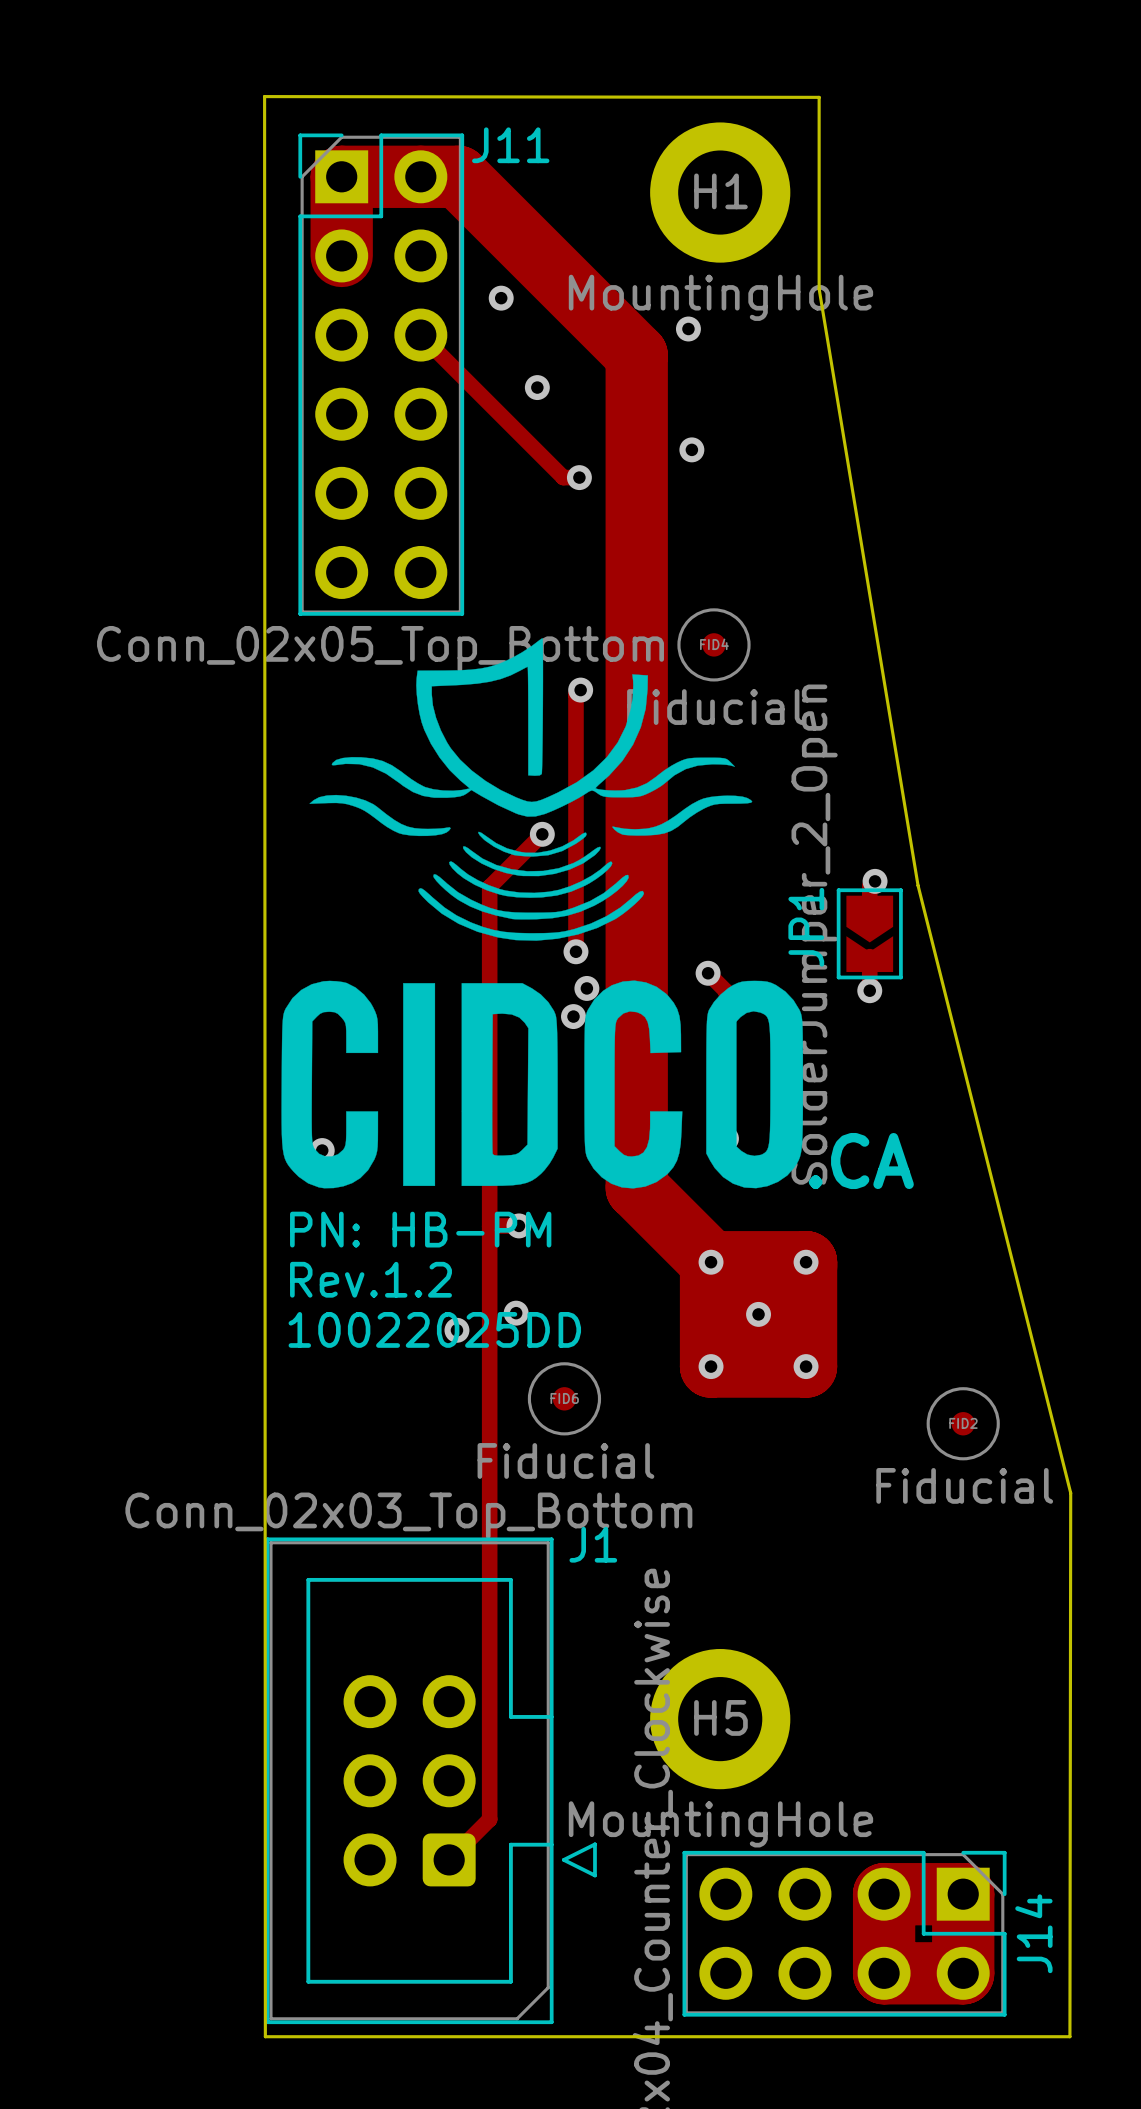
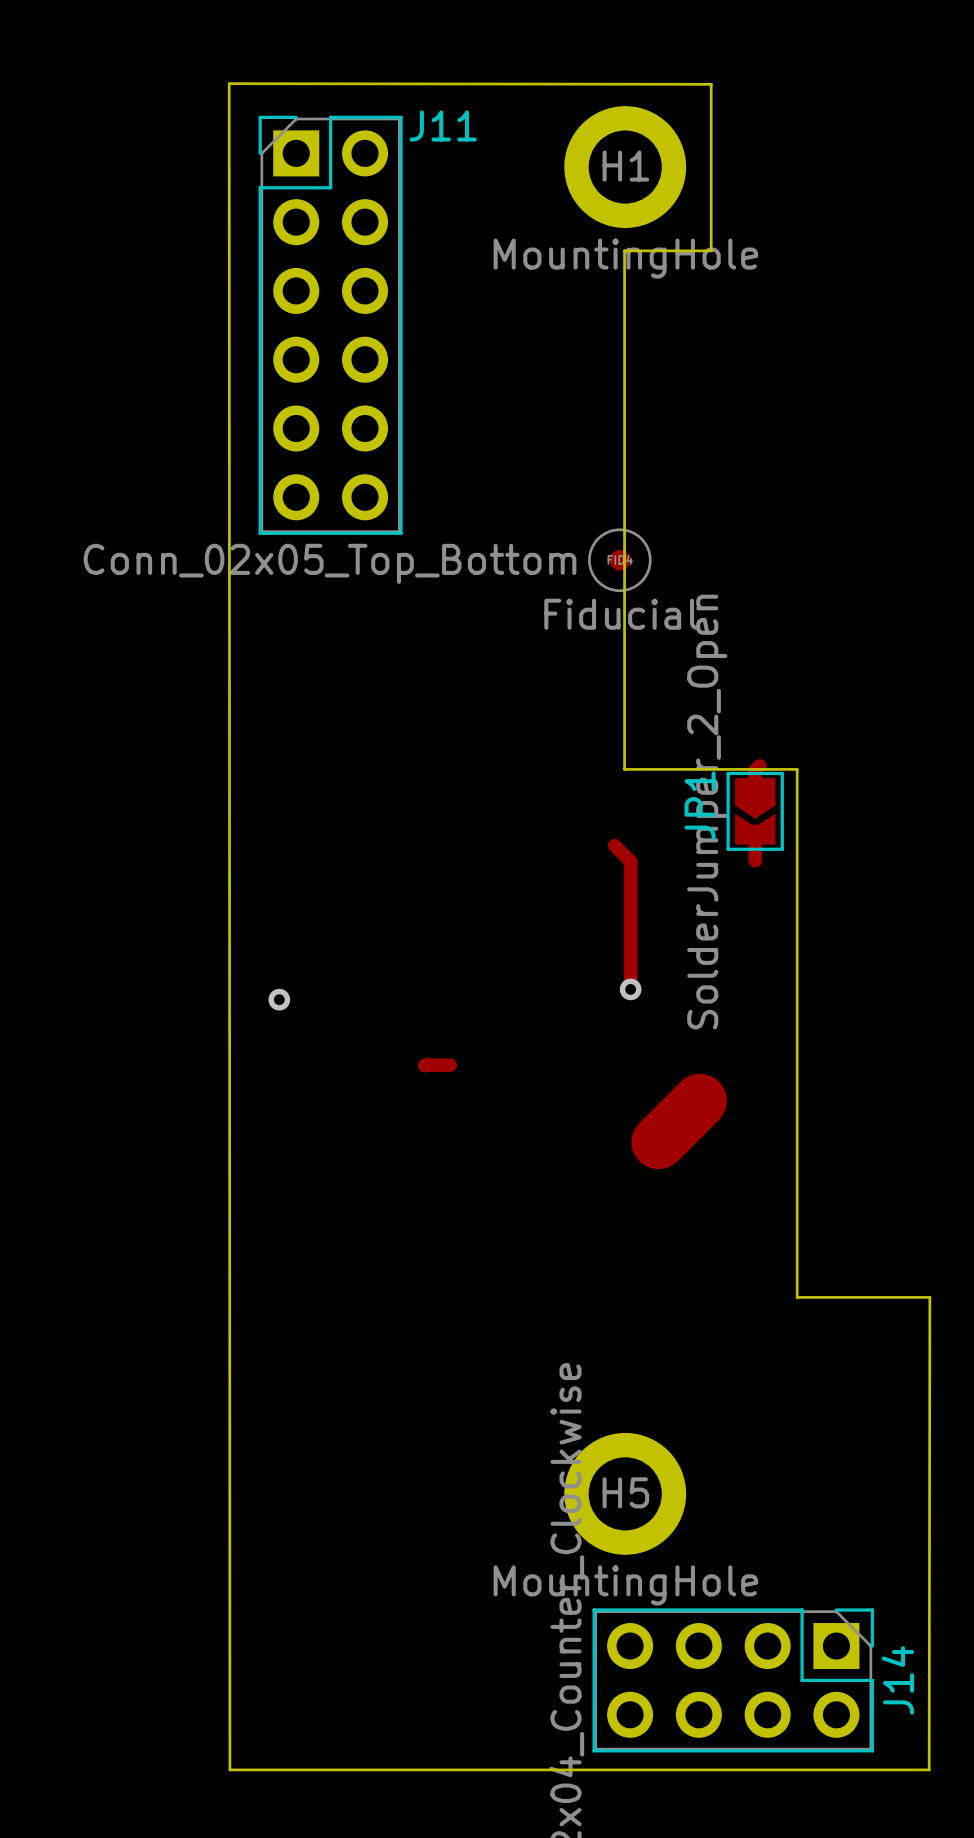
track: (341, 255) (341, 176) (458, 176) (636, 355) (636, 1187) (711, 1262) -> none
board edge: (819, 288) (918, 885) (1070, 1493) -> (711, 250) (624, 250) (624, 769) (797, 769) (797, 1297) (929, 1297)
via: (501, 298) -> none
via: (688, 328) -> none
track: (420, 335) (563, 477) (579, 477) -> none
via: (537, 387) -> none
via: (691, 449) -> none
via: (579, 477) -> none
drawing: [281, 638, 804, 1189] -> none
track: (580, 690) (575, 694) (575, 951) -> none
via: (580, 690) -> none
track: (542, 834) (489, 886) (489, 1819) (449, 1859) -> none
via: (542, 834) -> none
via: (875, 881) -> none
via: (575, 951) -> none
via: (708, 973) -> none
via: (586, 988) -> none
via: (869, 990) -> none
via: (573, 1016) -> none
text: .CA (861, 1161) -> none
via: (518, 1225) -> none
text: PN: HB-PM (420, 1229) -> none
track: (711, 1262) (806, 1262) (806, 1366) (711, 1366) (711, 1262) -> none
via: (711, 1262) -> none
via: (806, 1262) -> none
text: Rev.1.2 (371, 1279) -> none
via: (516, 1313) -> none
via: (758, 1314) -> none
text: 10022025DD (434, 1329) -> none
via: (456, 1330) -> none
via: (711, 1366) -> none
via: (806, 1366) -> none
FID6: Fiducial (564, 1398) -> none
FID2: Fiducial (963, 1423) -> none
J1: Conn_02x03_Top_Bottom (431, 1780) -> none
track: (884, 1894) (963, 1894) (963, 1973) (884, 1973) (884, 1894) -> none

